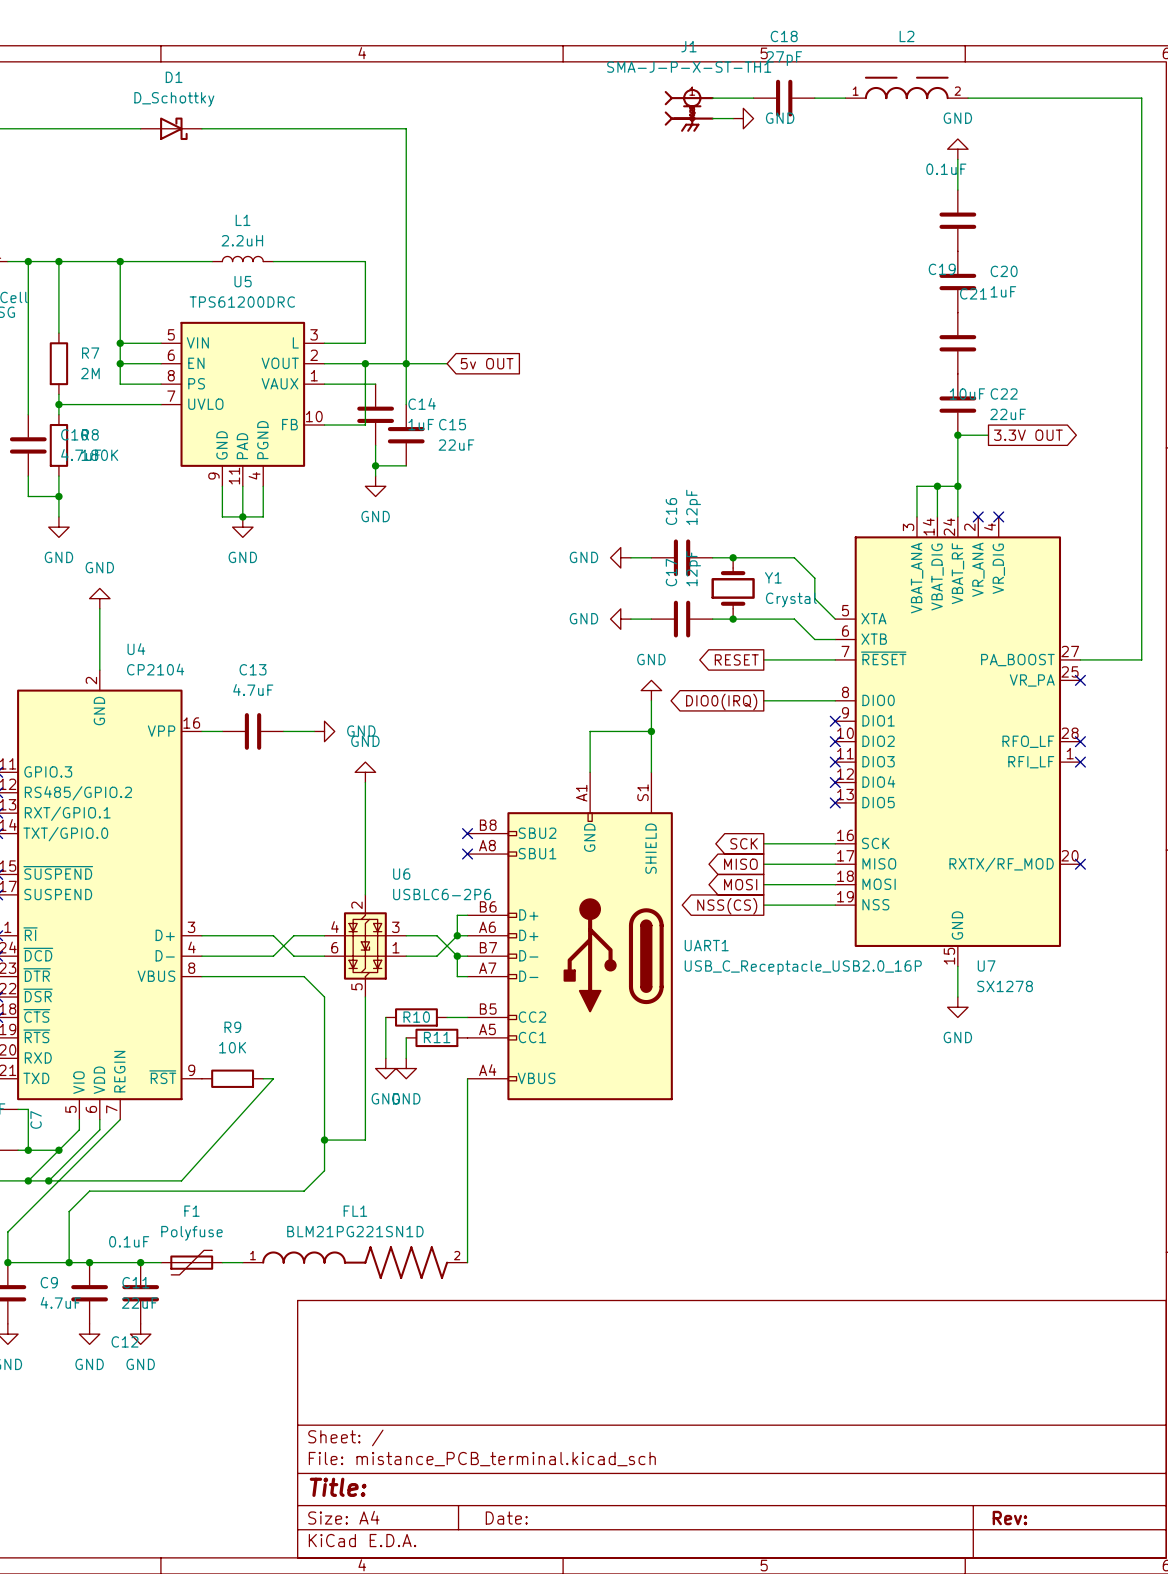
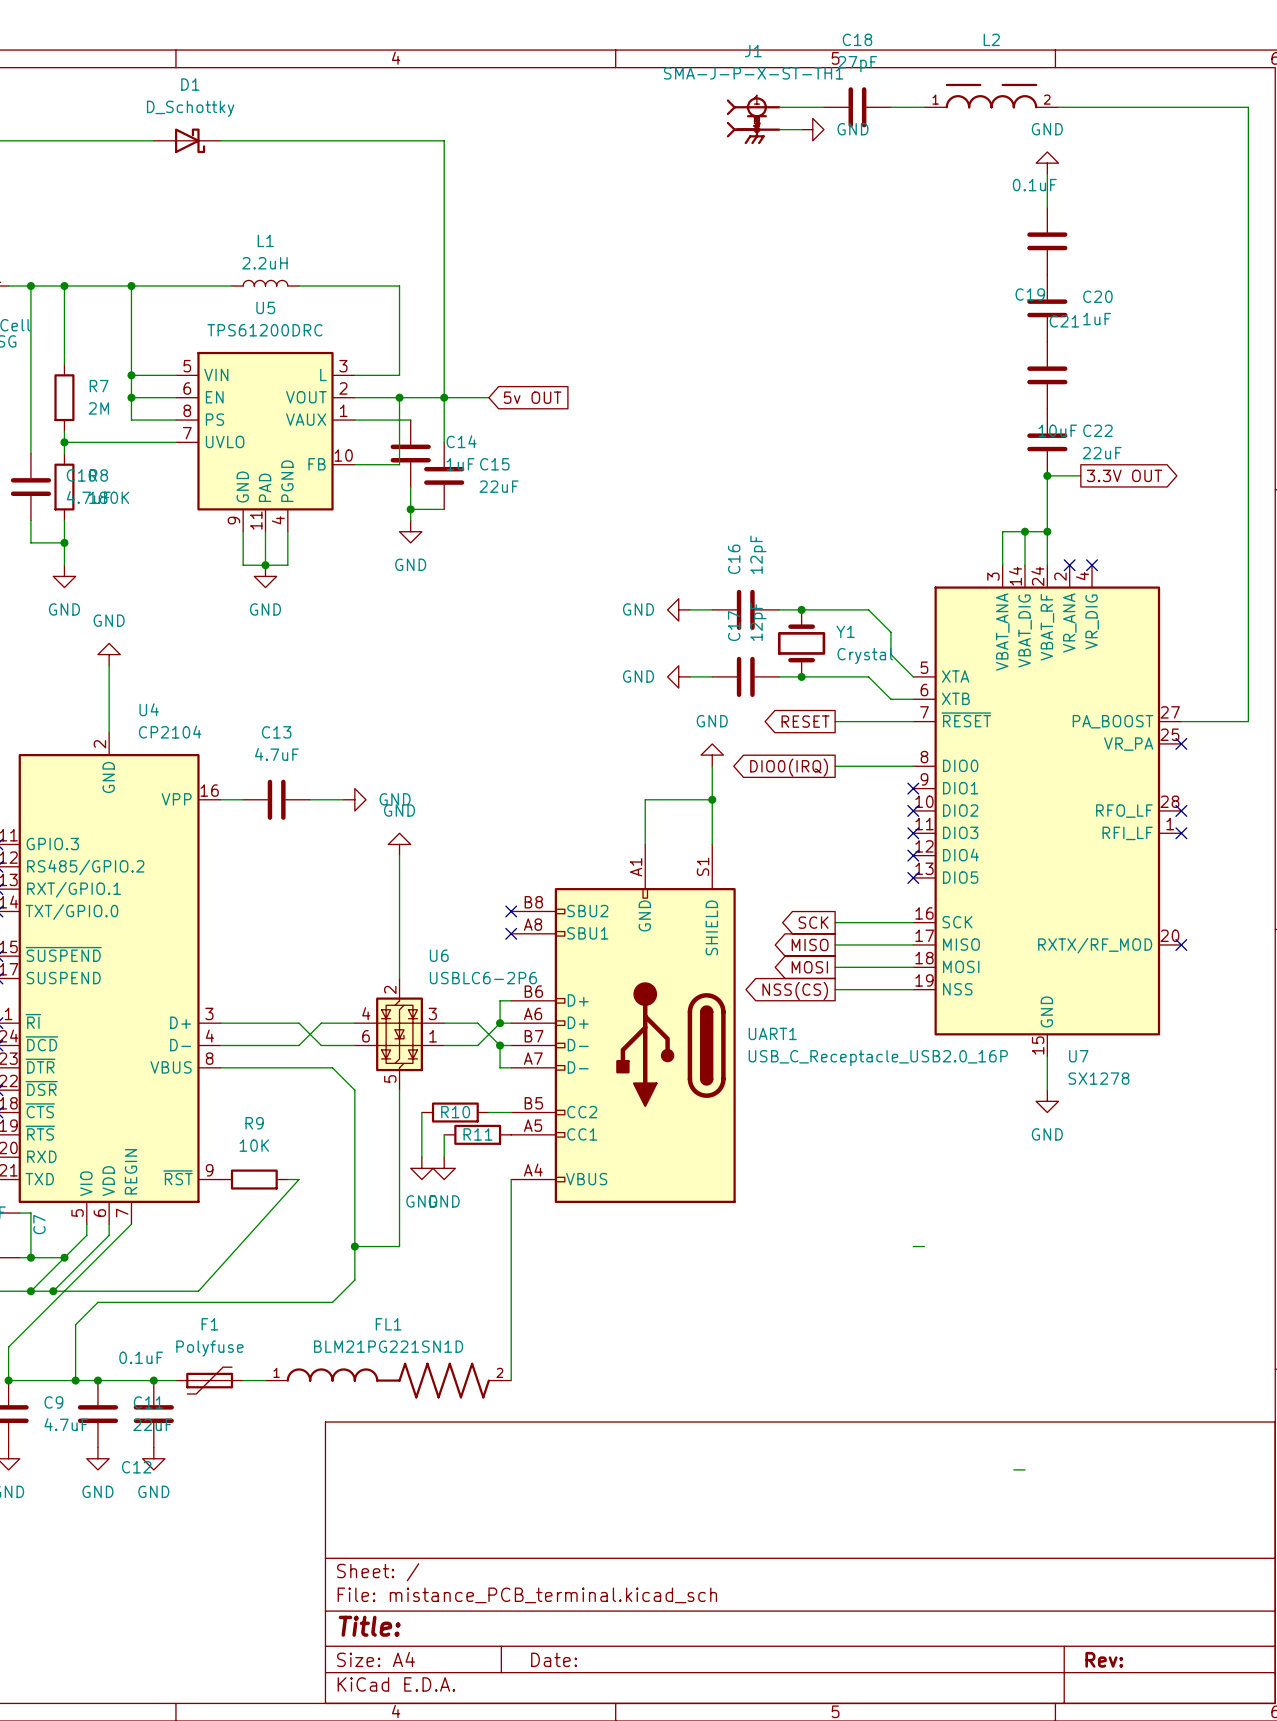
wire: none -> (913, 1246) (924, 1246)
wire: none -> (1013, 1469) (1024, 1469)

